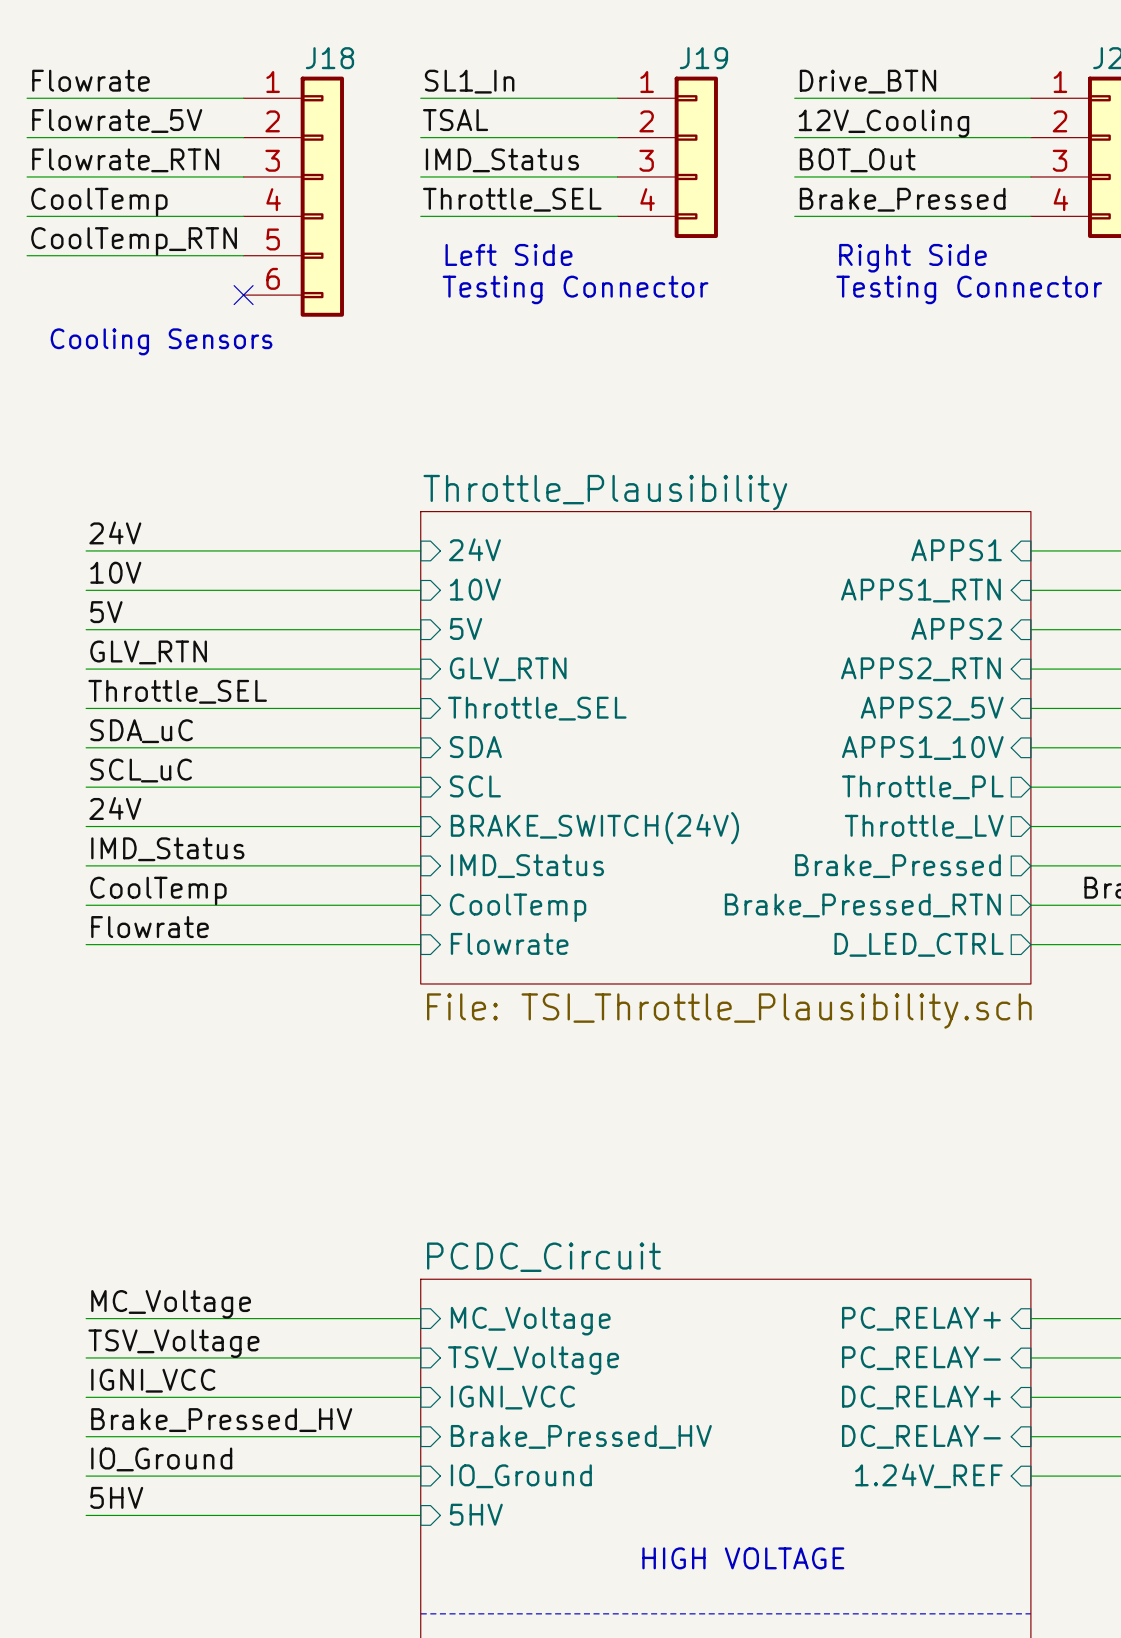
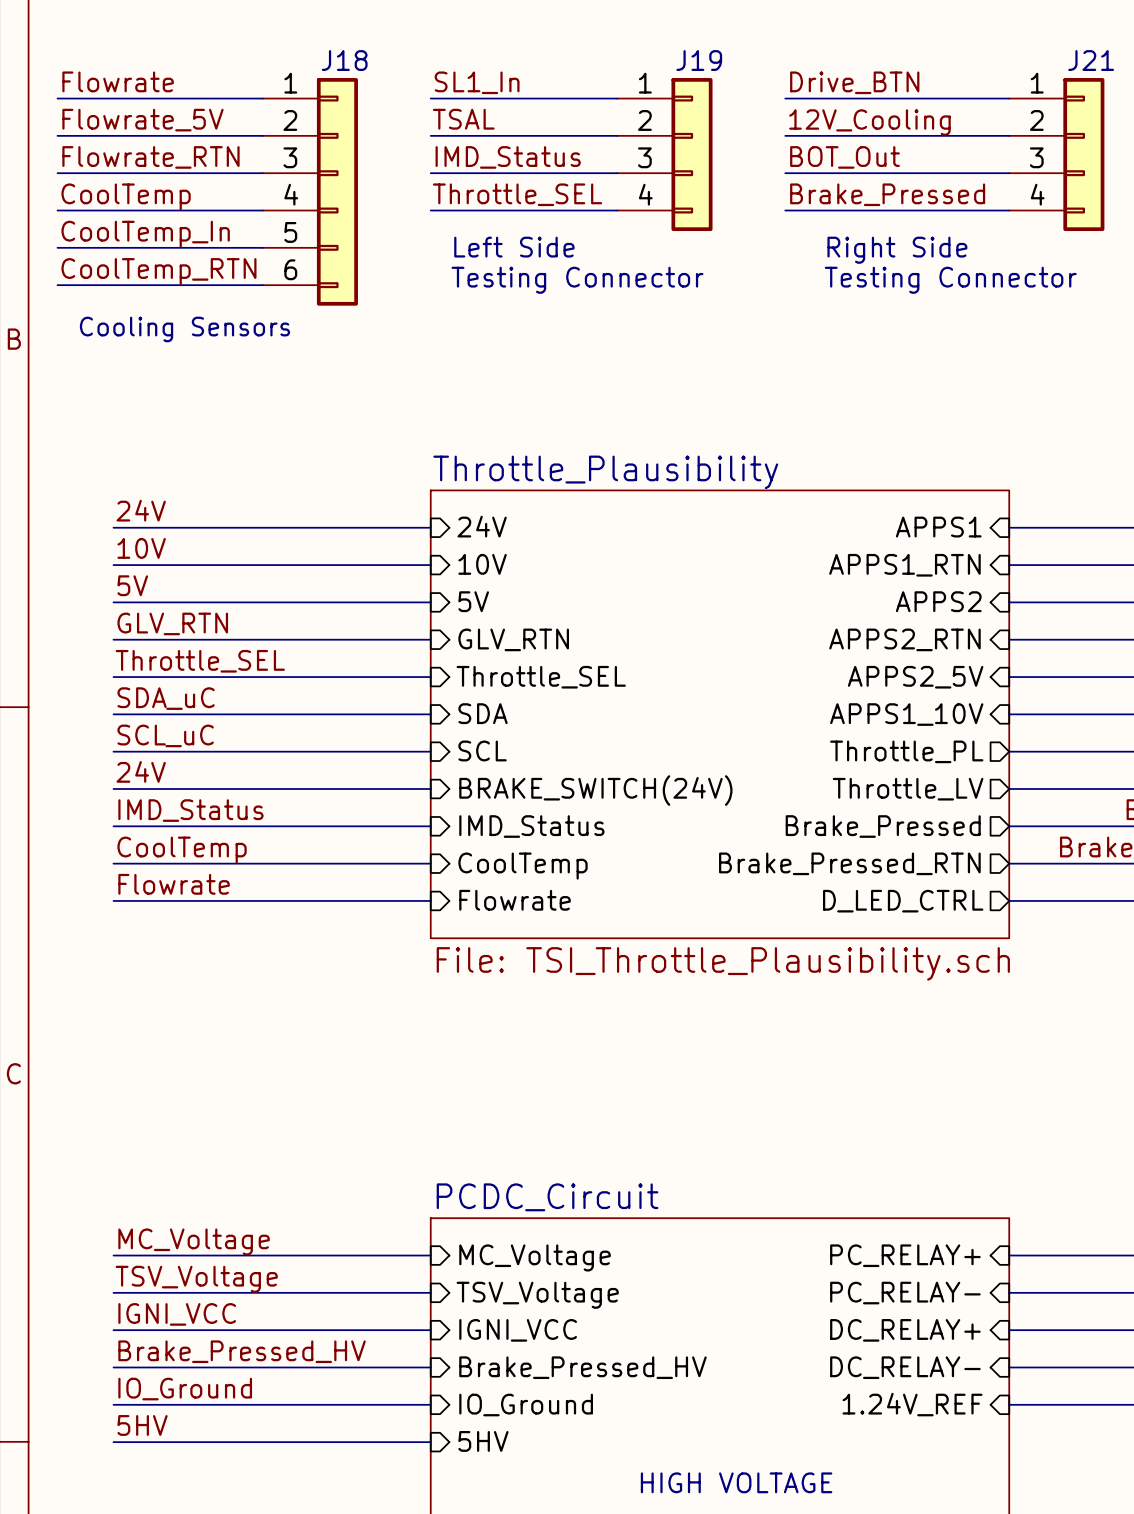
label: CoolTemp_RTN (134, 241) -> CoolTemp_In (145, 234)
label: none -> CoolTemp_RTN (158, 271)
wire: none -> (57, 285) (262, 285)
no-connect mark: (243, 295) -> none

